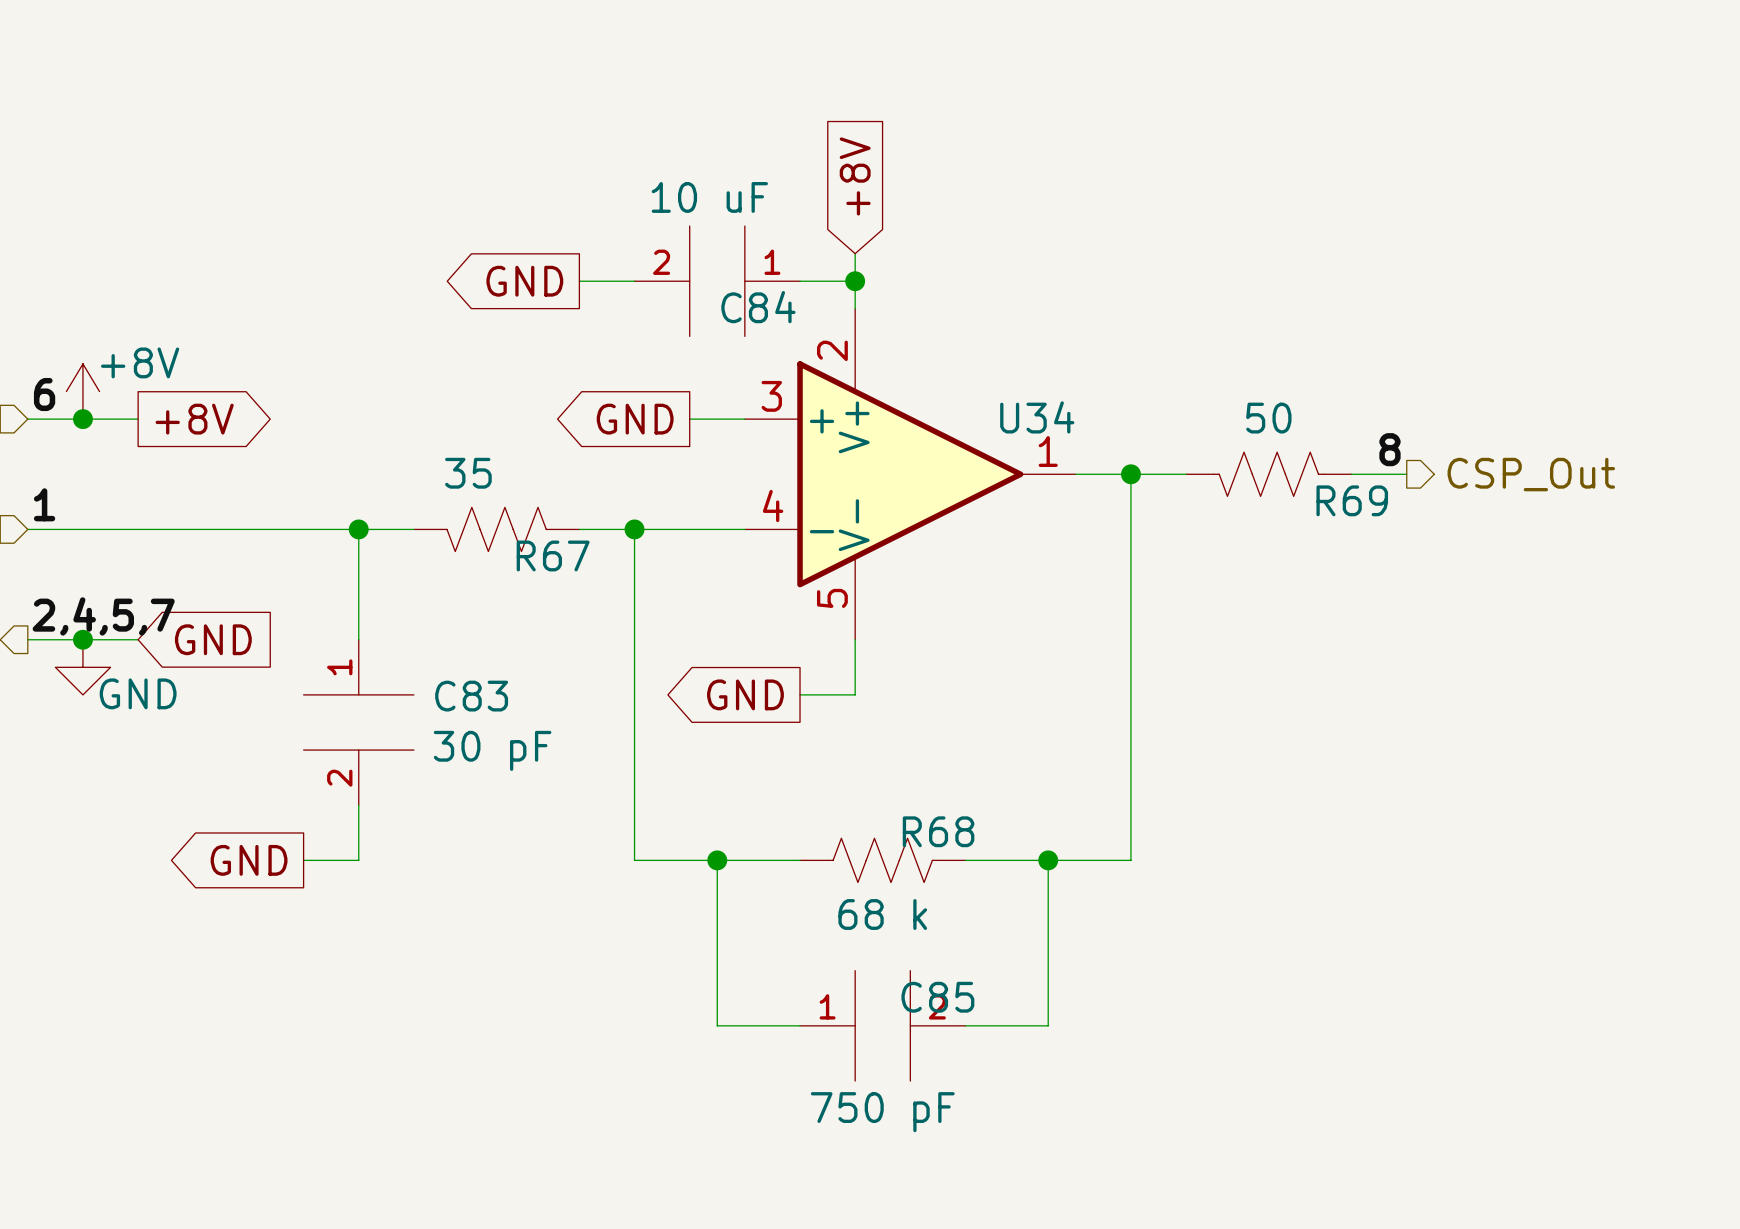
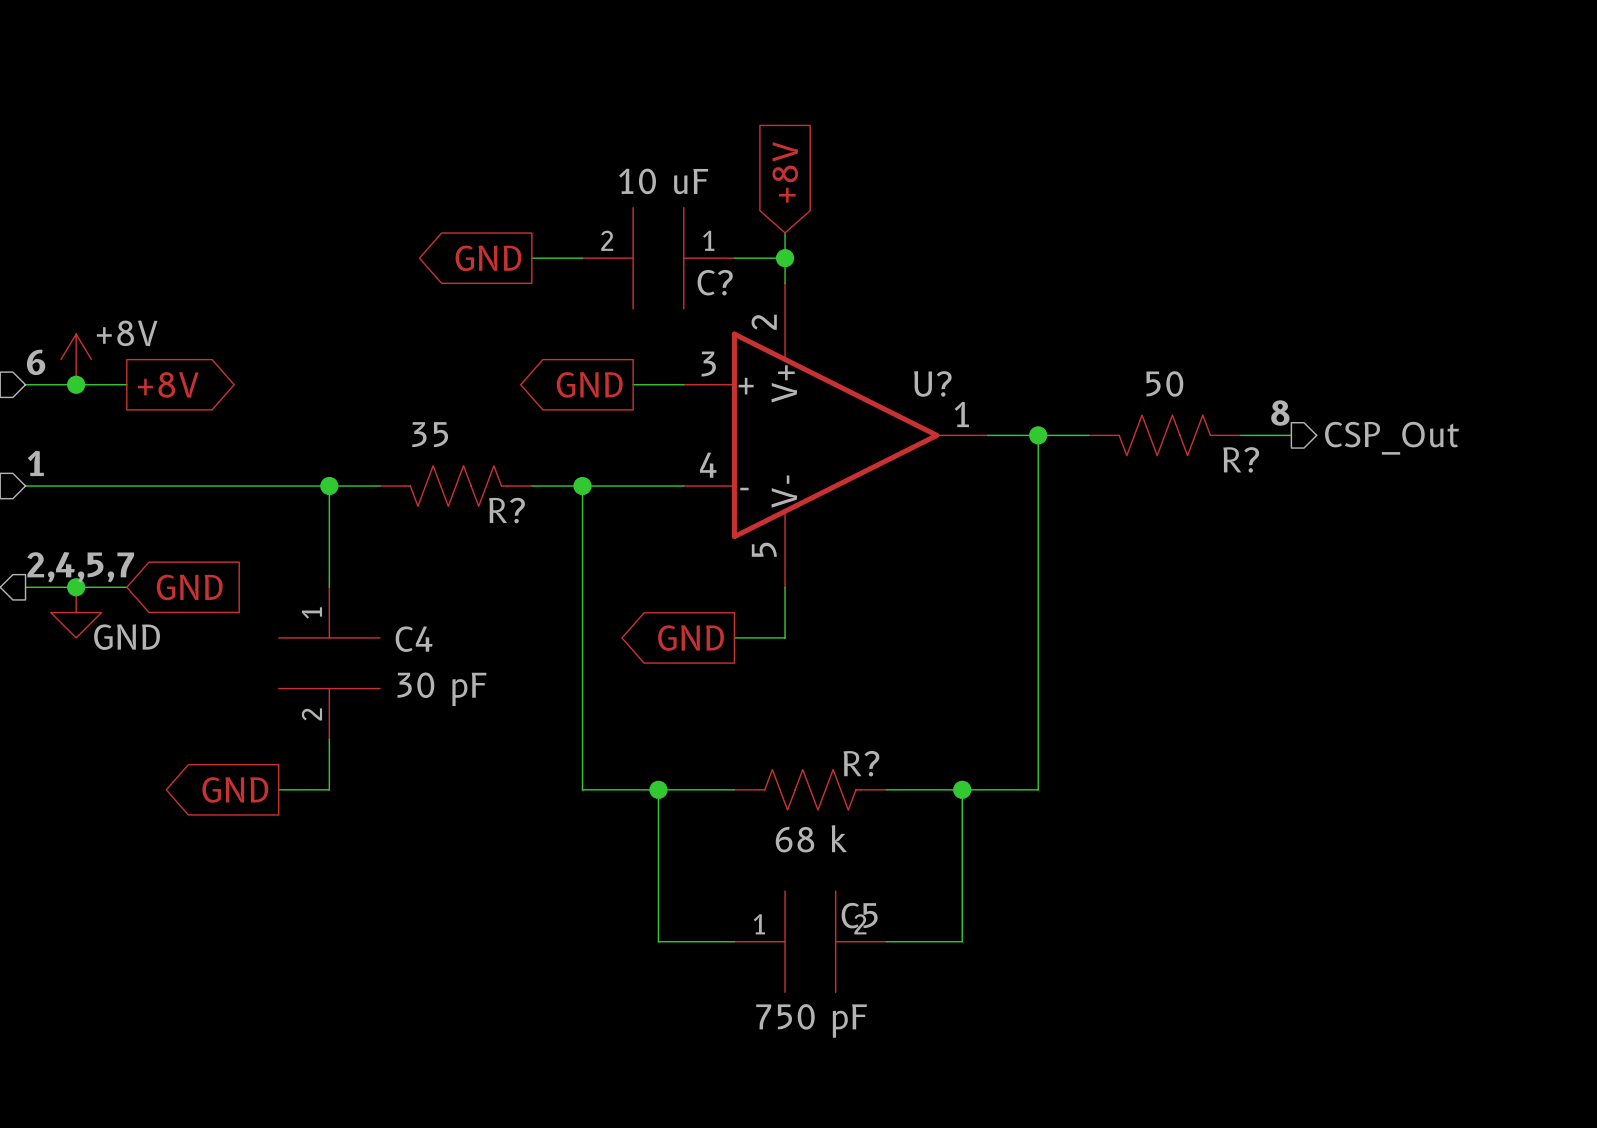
C84 name: C84 (758, 307) -> C? (715, 282)
U34 name: U34 (1037, 417) -> U? (932, 383)
R69 name: R69 (1352, 500) -> R? (1241, 459)
R67 name: R67 (553, 555) -> R? (507, 510)
C83 name: C83 (471, 696) -> C4 (414, 639)
R68 name: R68 (938, 831) -> R? (861, 763)
C85 name: C85 (937, 997) -> C5 (859, 915)

